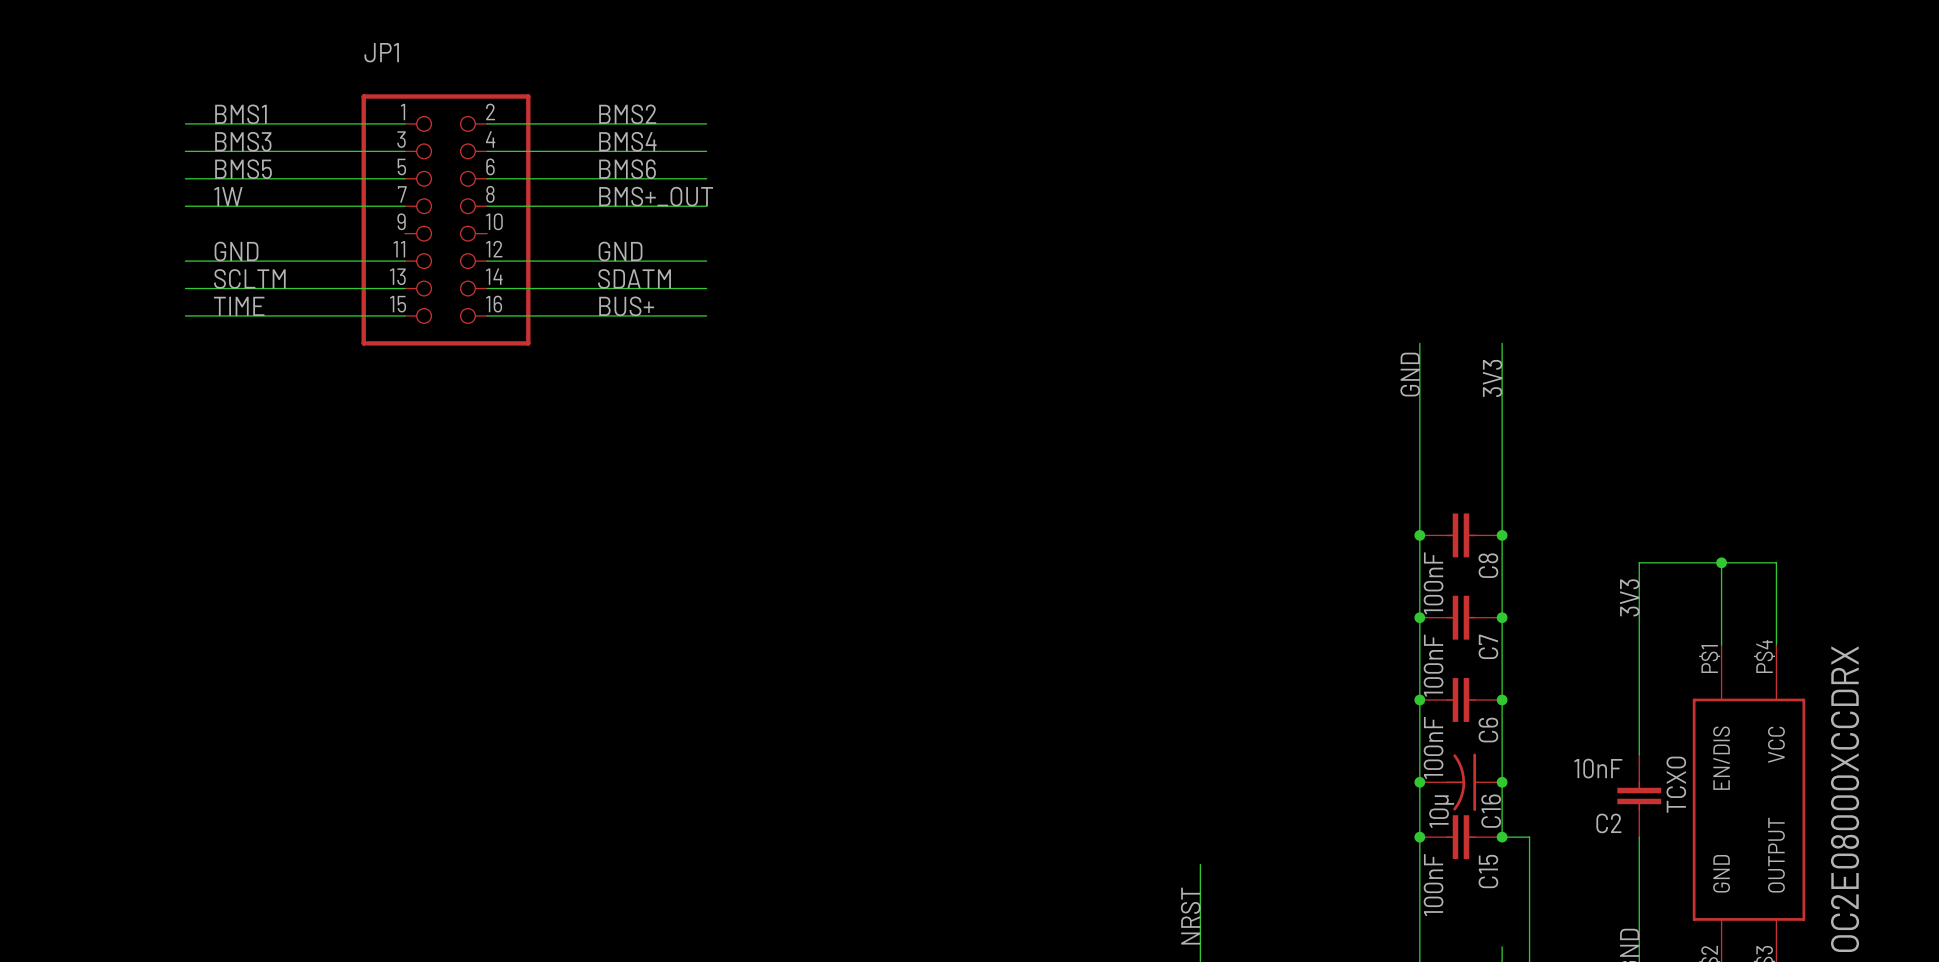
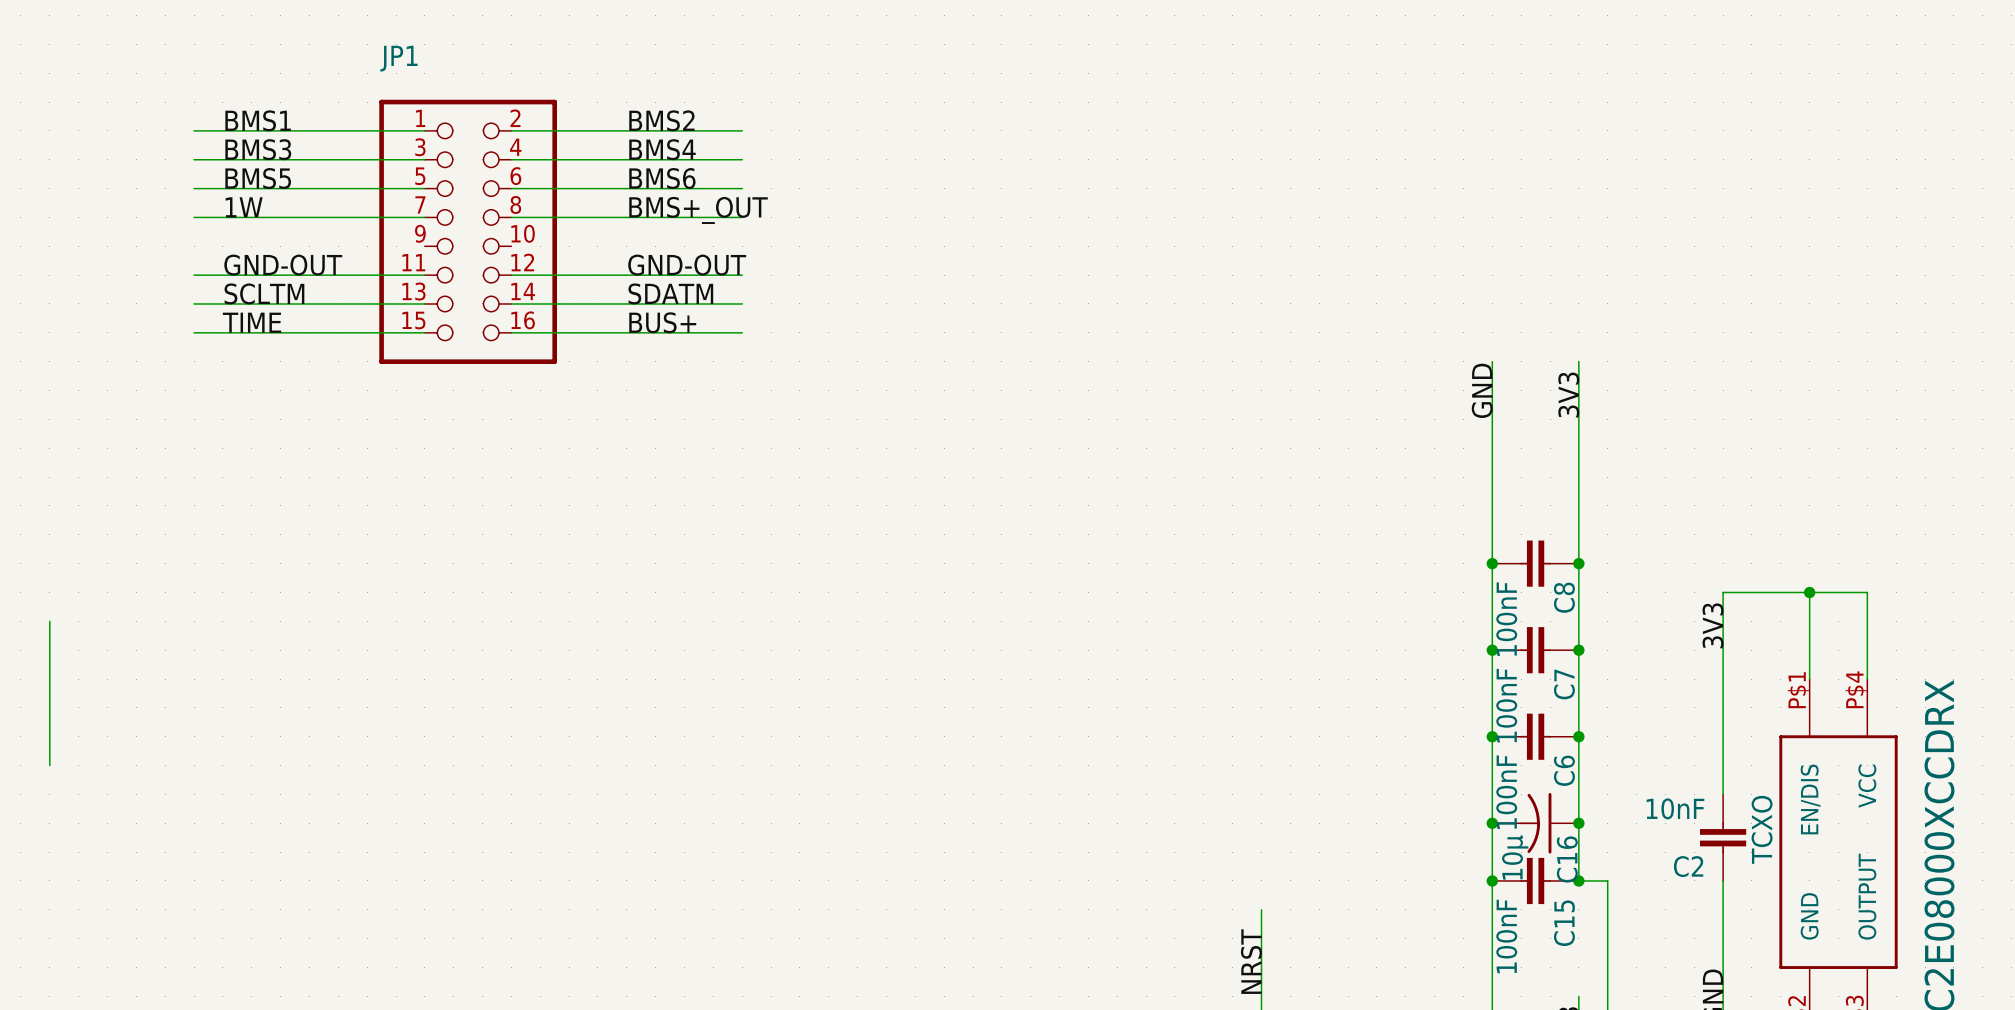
label: GND (236, 251) -> GND-OUT (283, 265)
label: GND (620, 251) -> GND-OUT (687, 265)
wire: none -> (49, 621) (49, 765)

